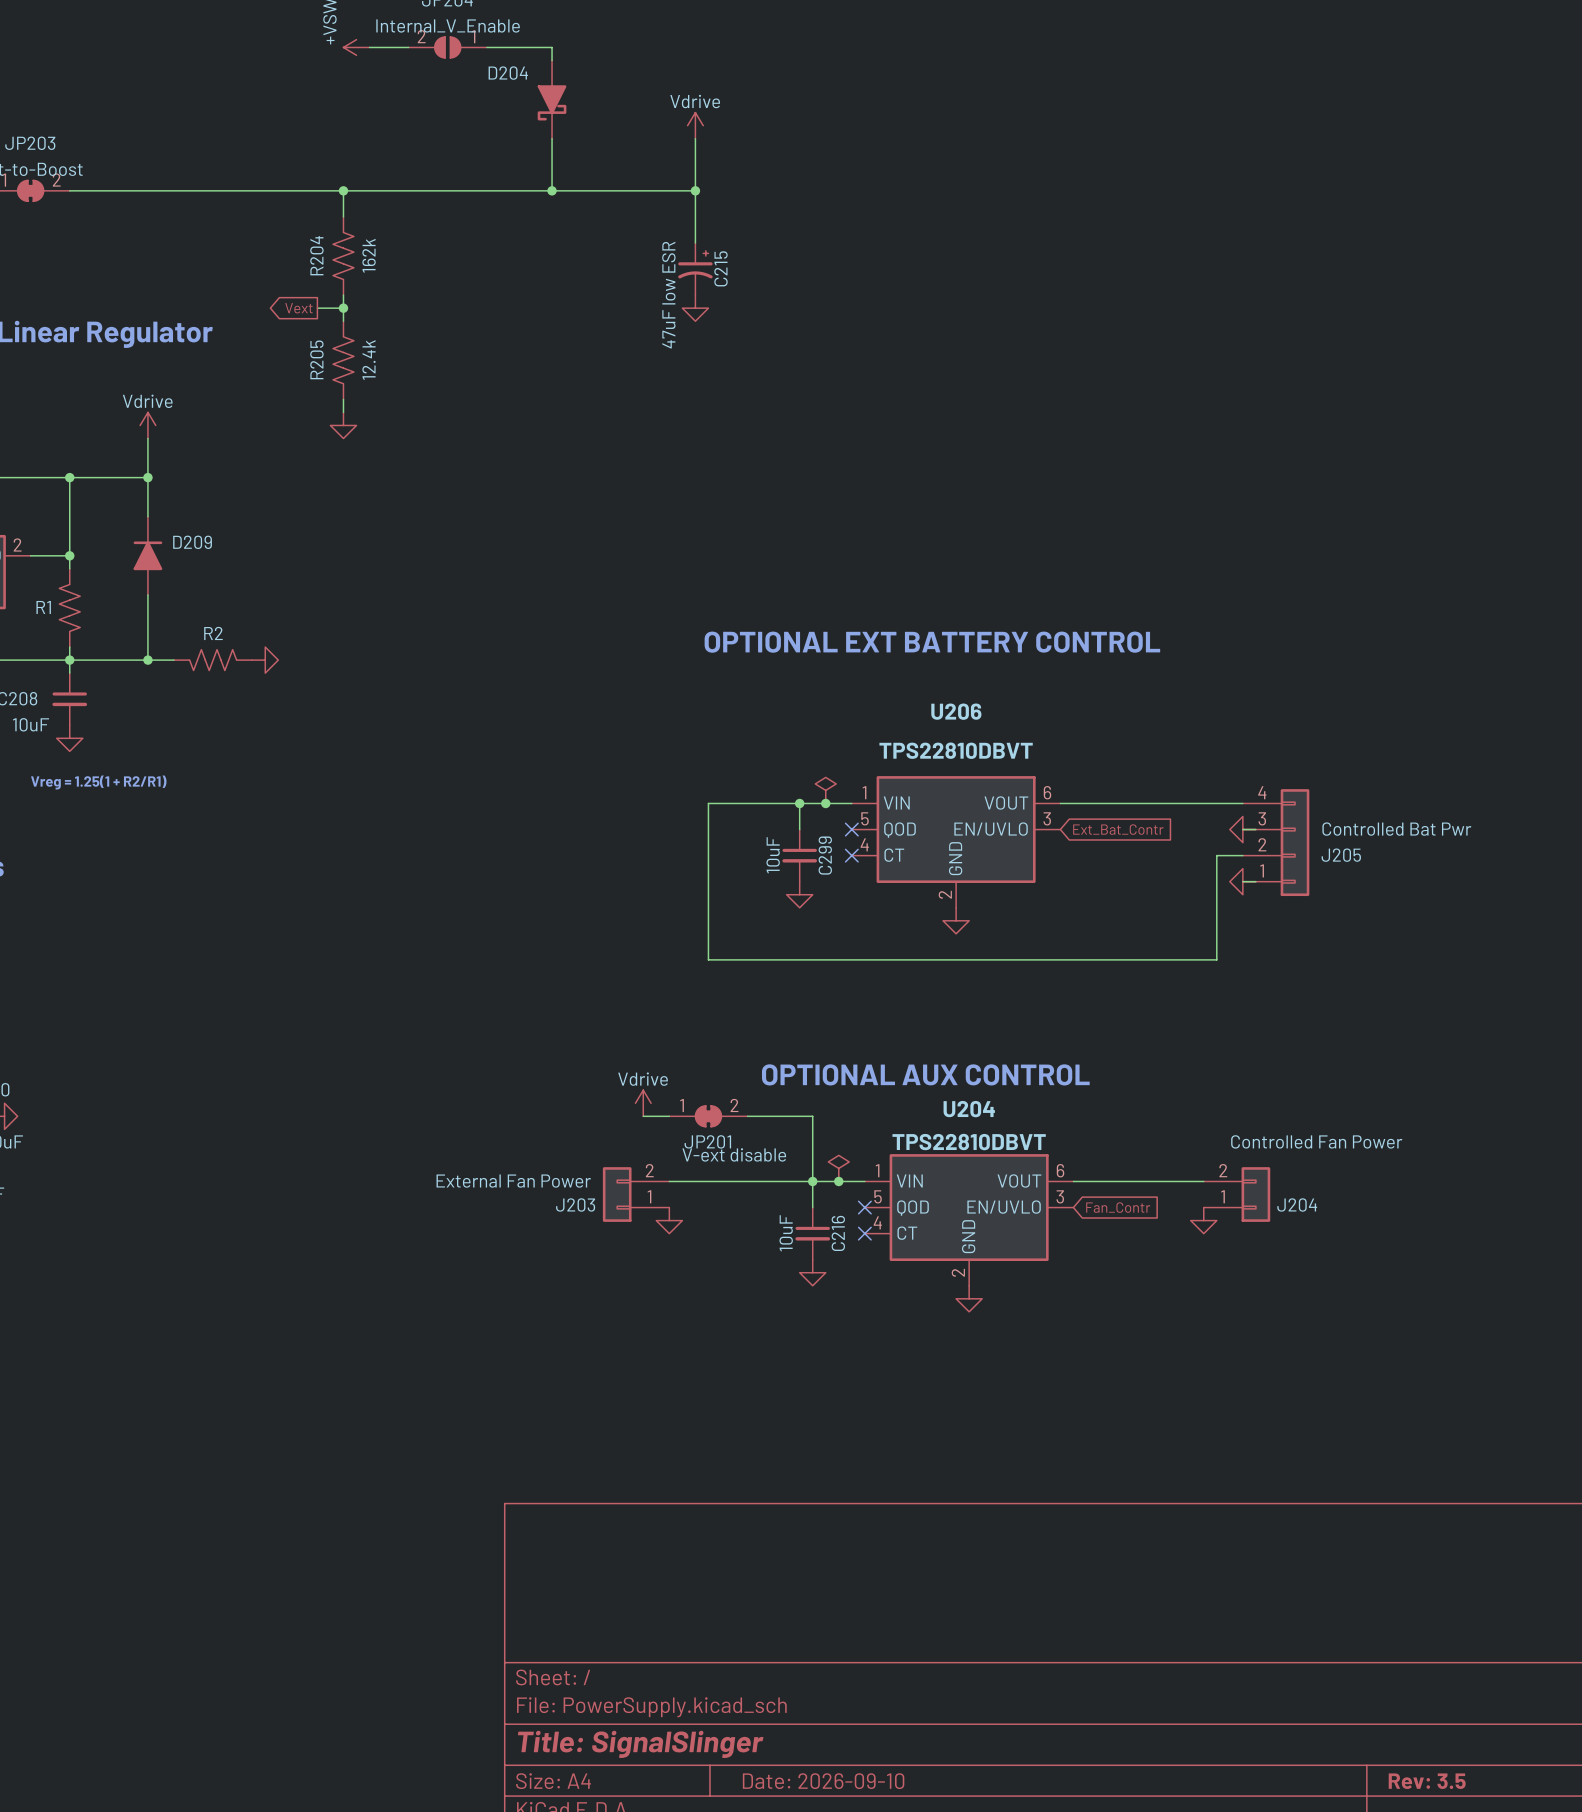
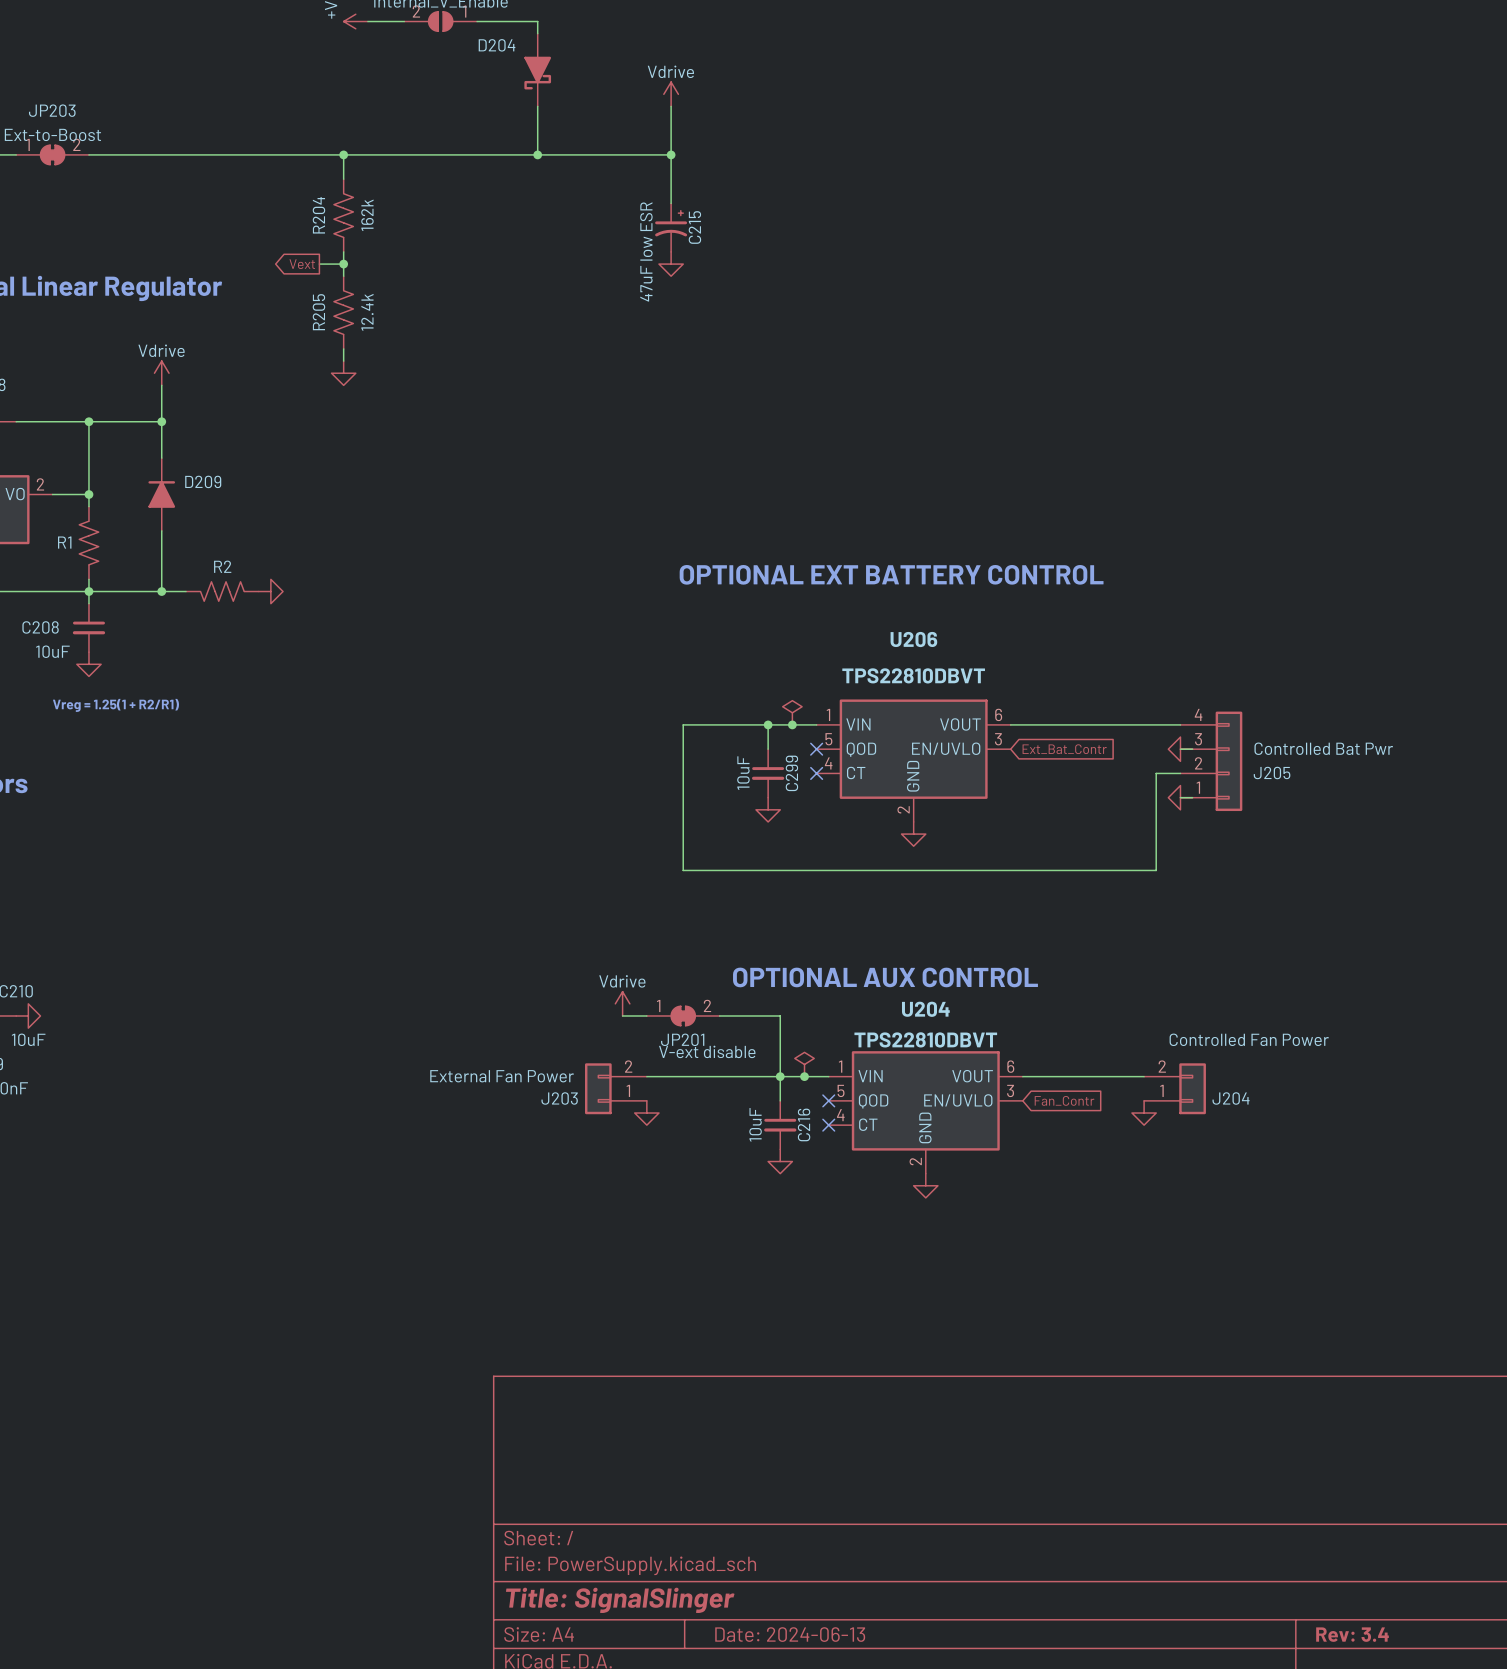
title block: Date: 2026-09-10 (823, 1781) -> Date: 2024-06-13 (790, 1634)
title block: Rev: 3.5 (1427, 1781) -> Rev: 3.4 (1352, 1634)

